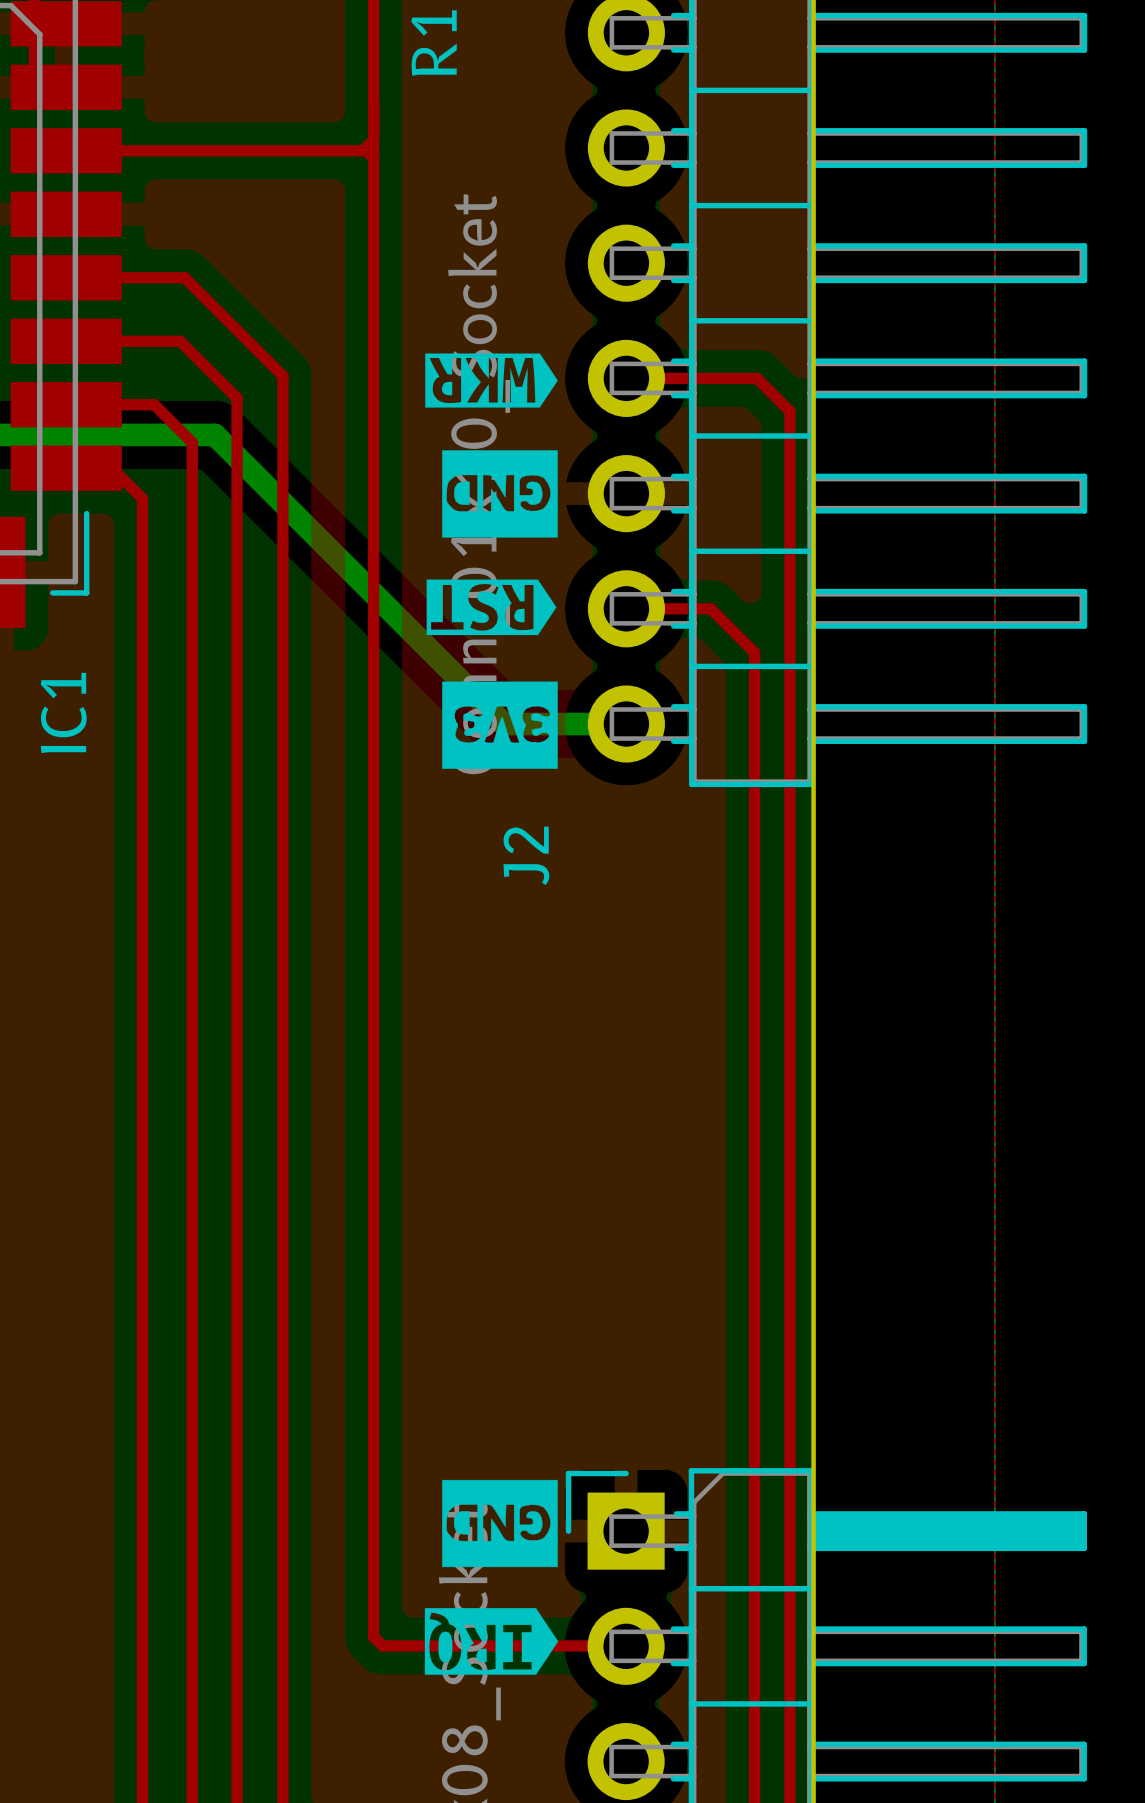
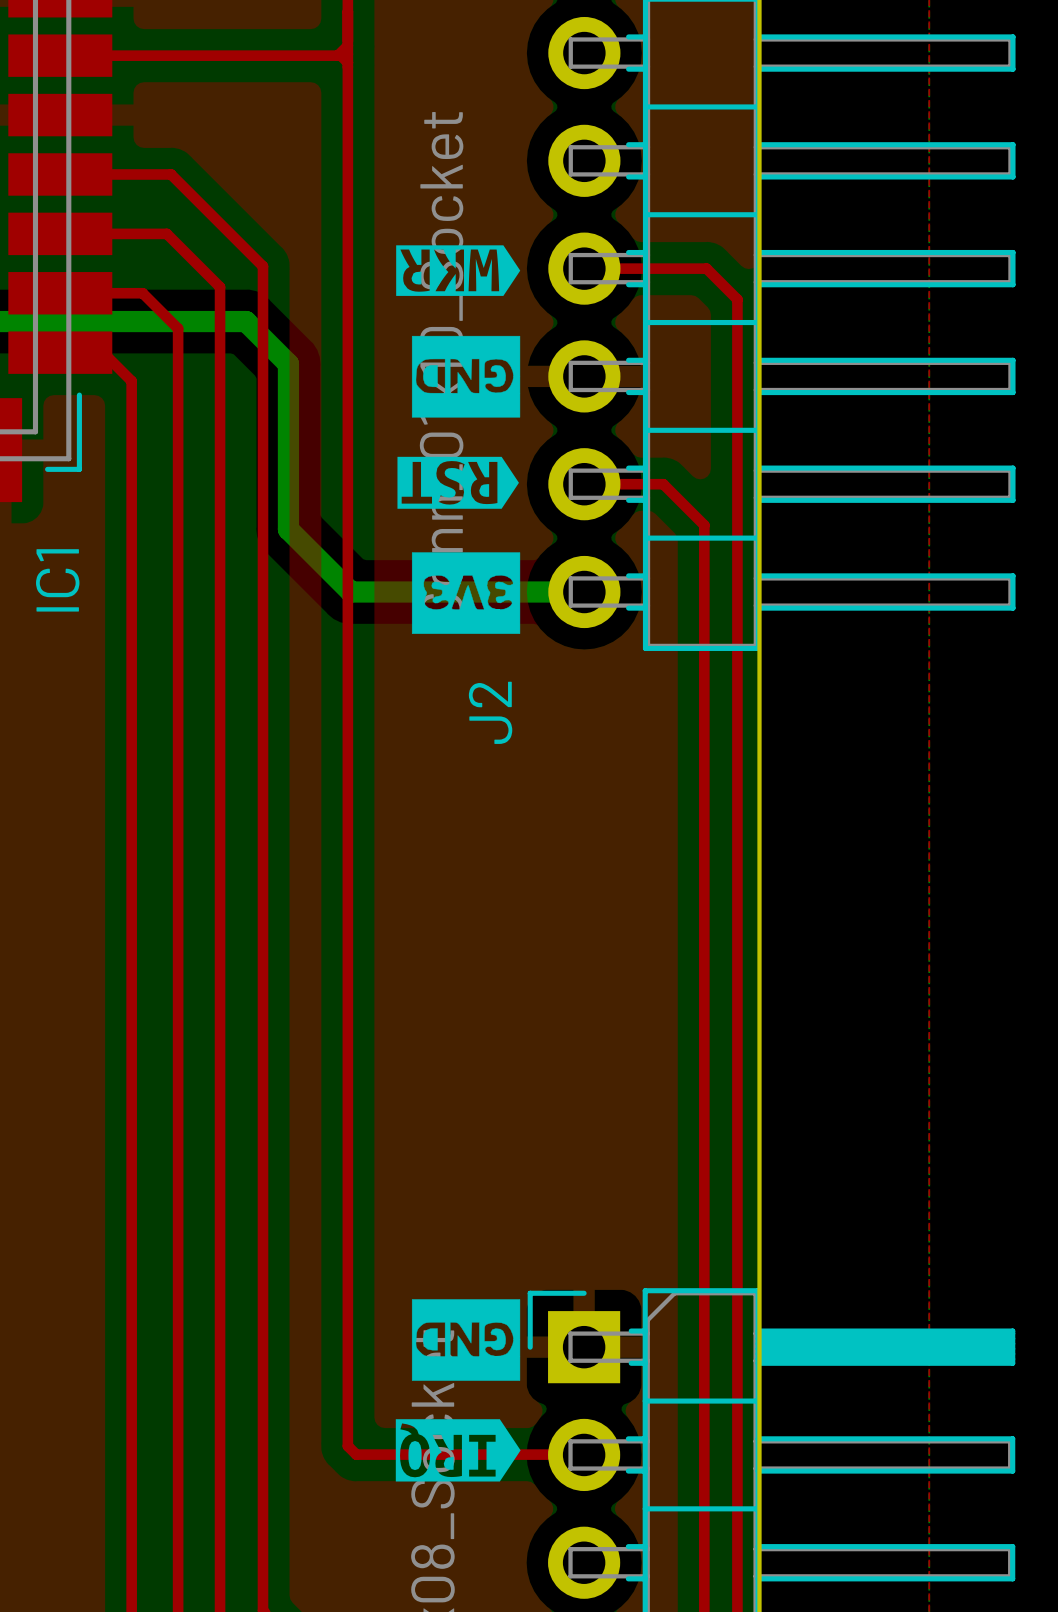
bottom track: (214, 434) (503, 724) -> (199, 321) (246, 321) (288, 363) (288, 529) (350, 592) (469, 592)

